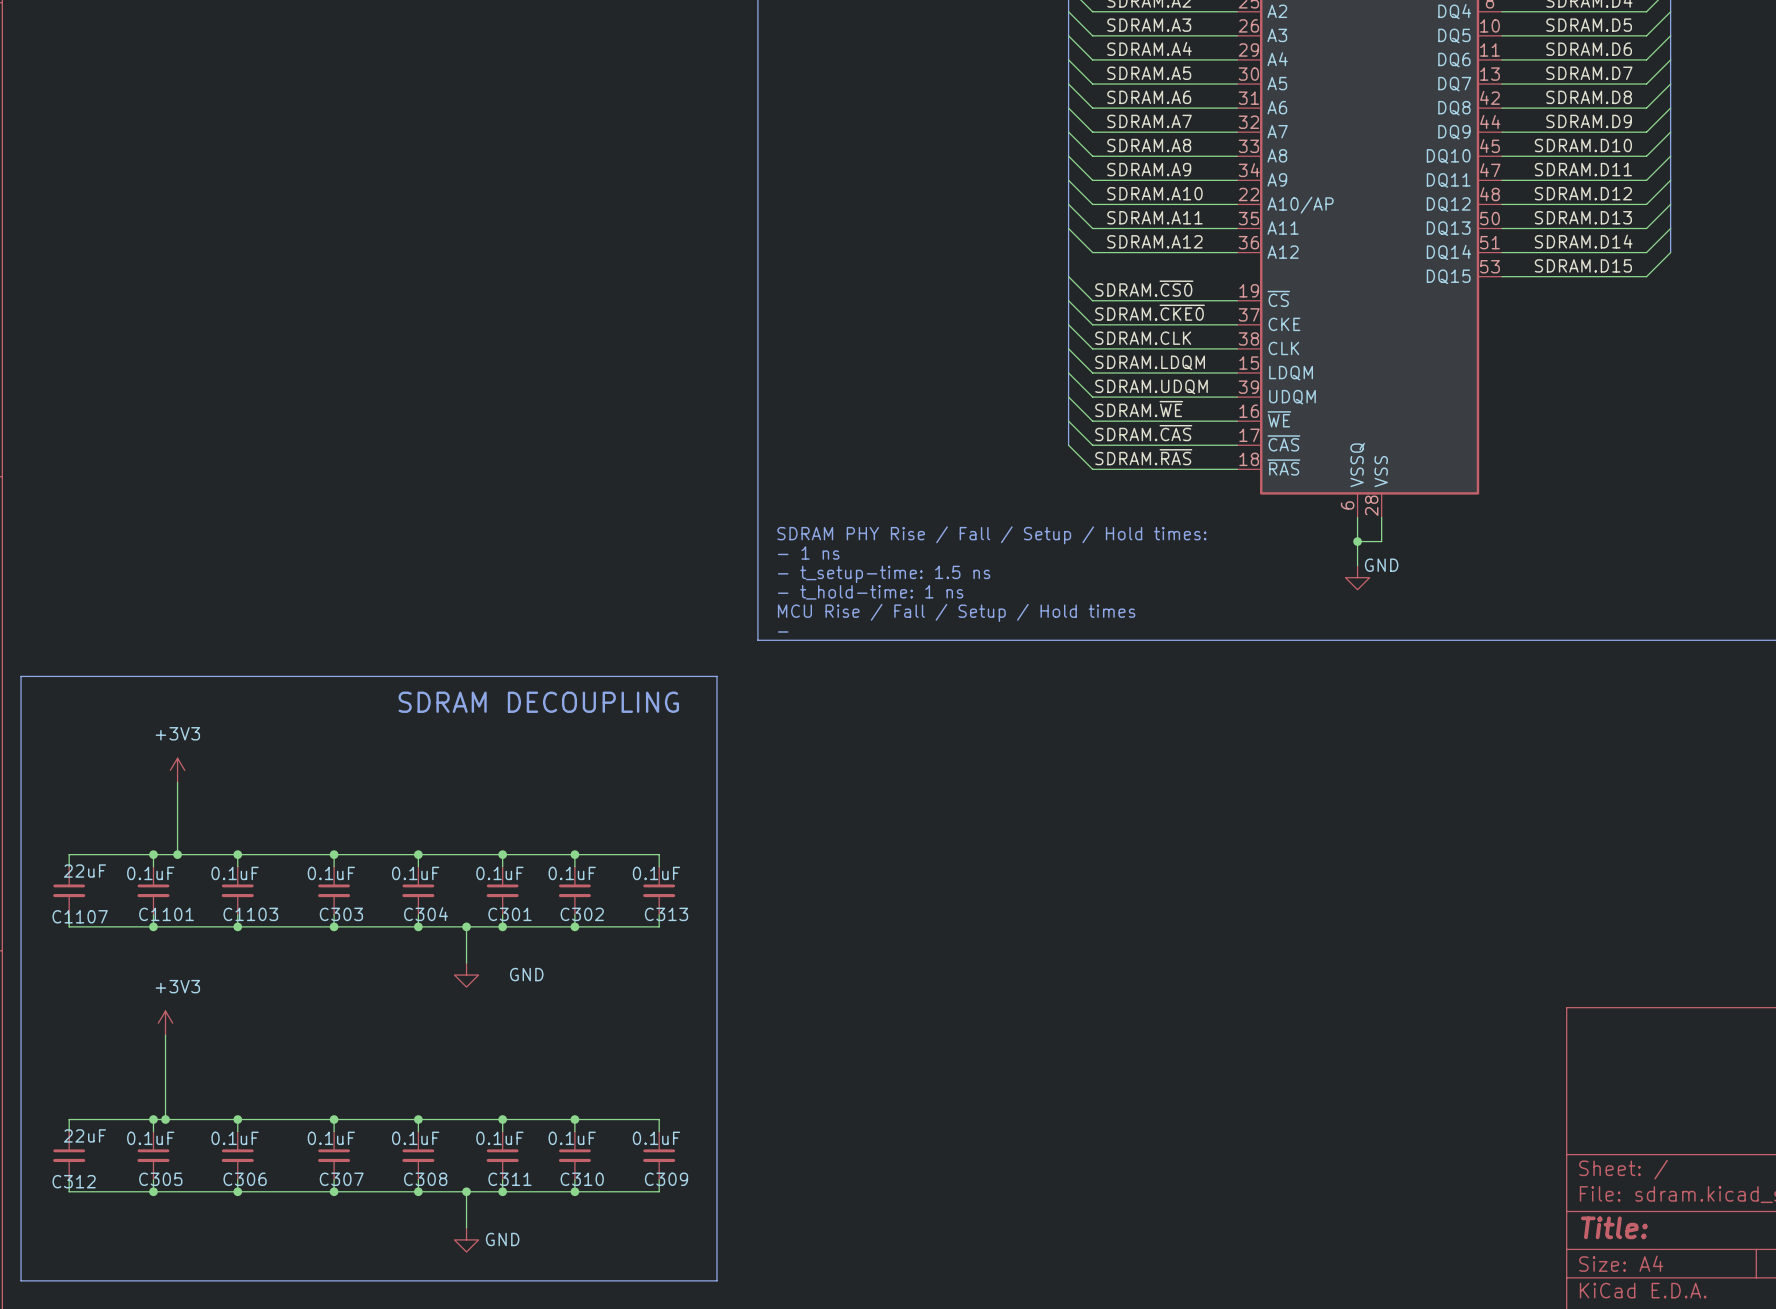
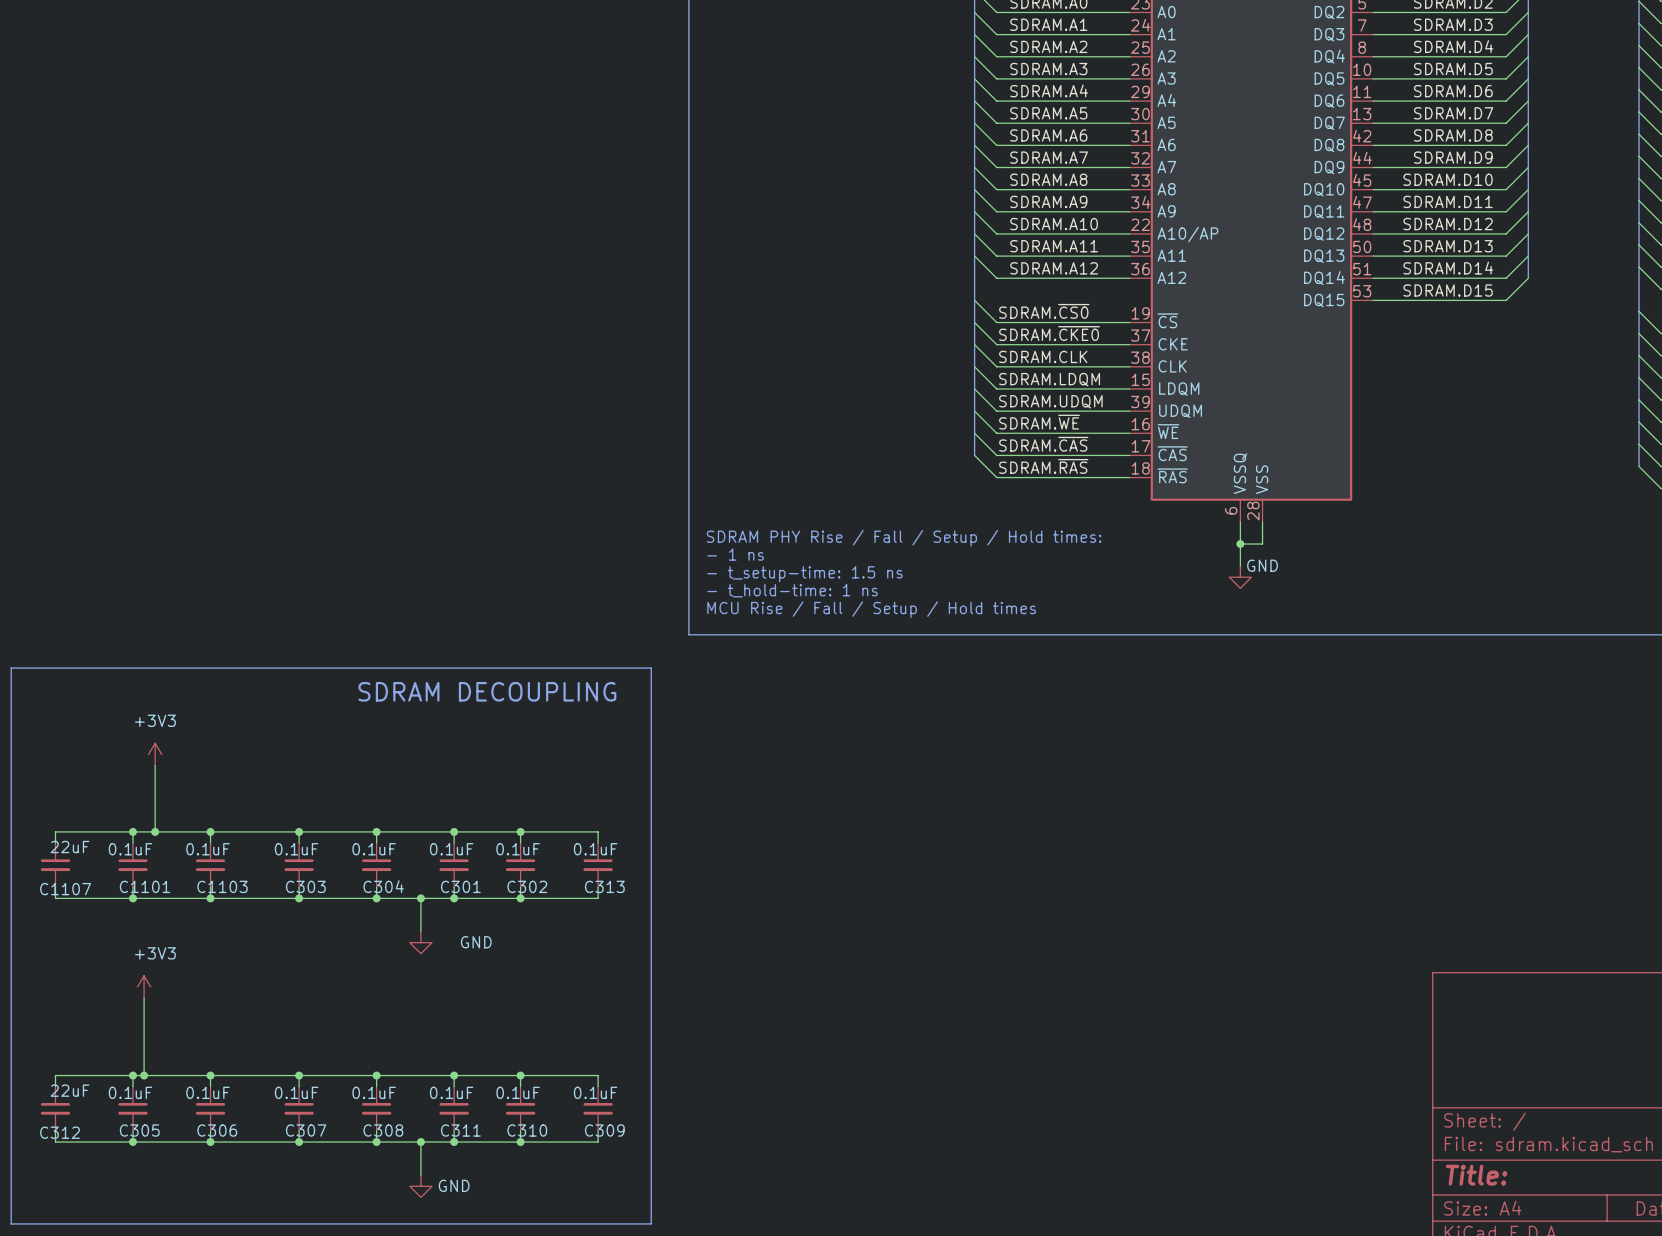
text: - (783, 631) -> none

